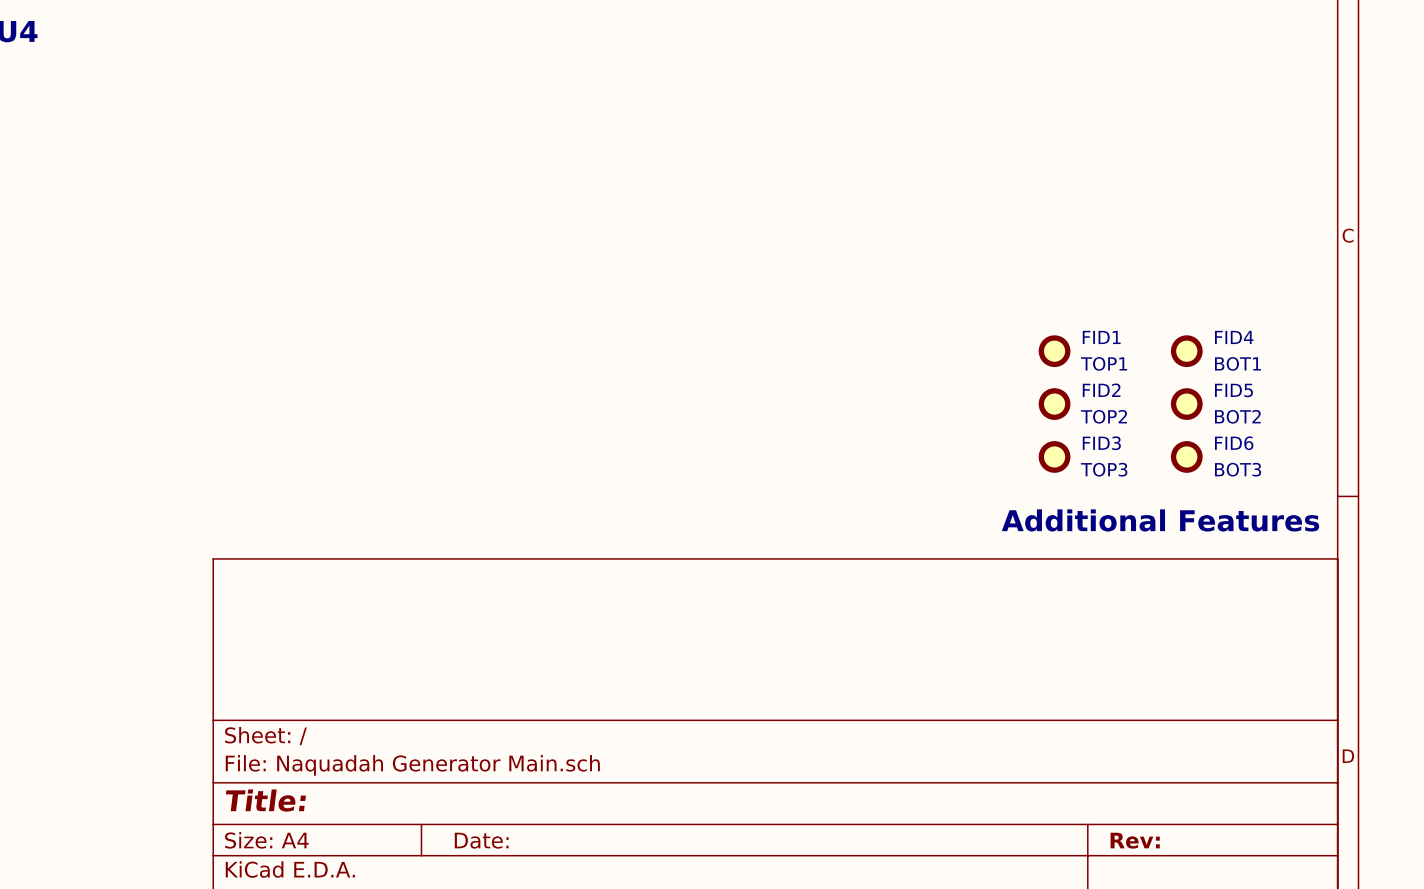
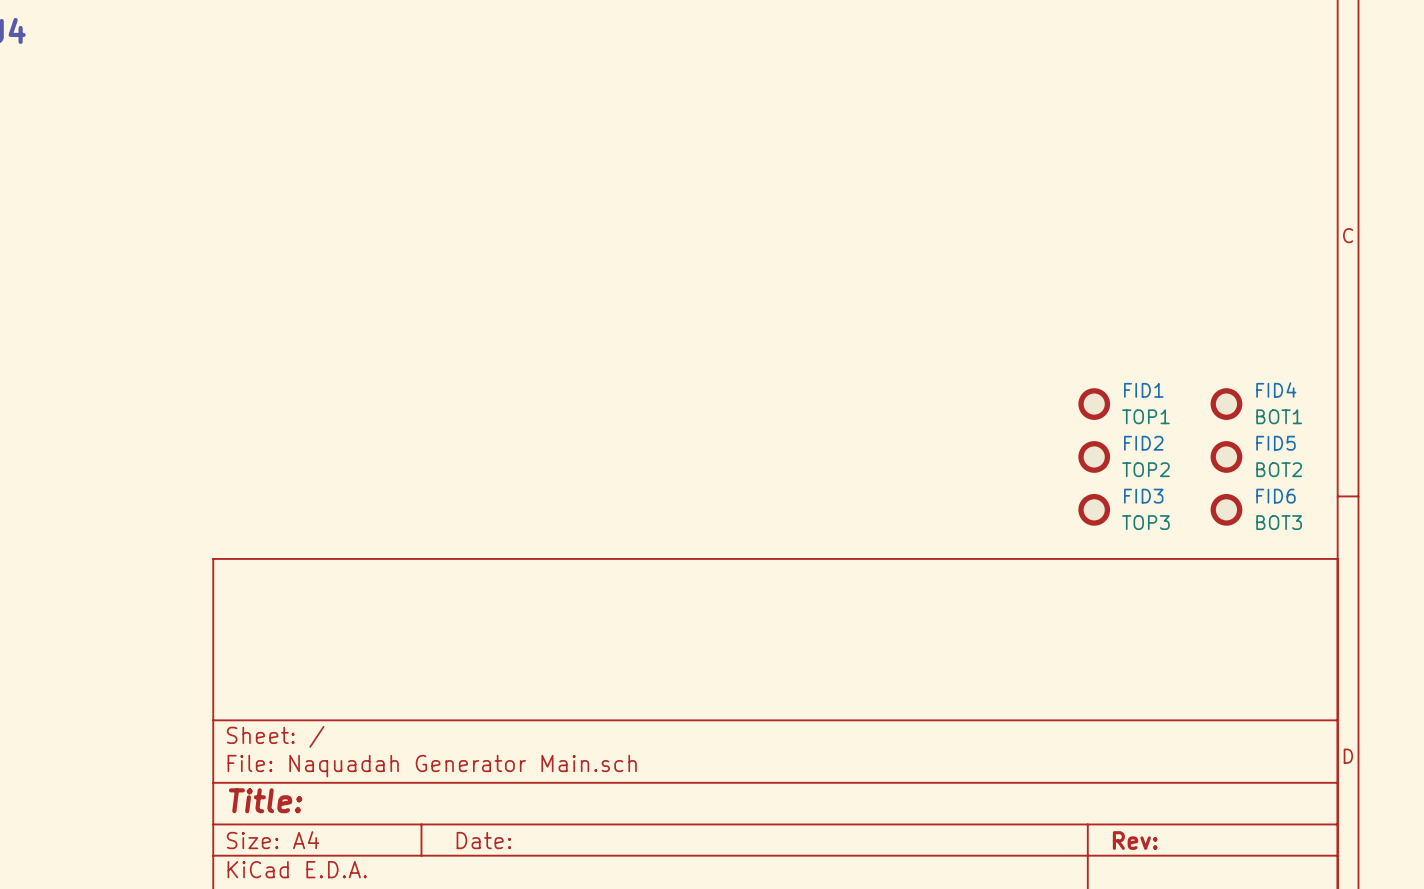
FID1 position: (1054, 351) -> (1094, 404)
FID4 position: (1186, 351) -> (1226, 404)
FID2 position: (1054, 404) -> (1094, 456)
FID5 position: (1186, 404) -> (1226, 456)
FID3 position: (1054, 456) -> (1094, 509)
FID6 position: (1186, 456) -> (1226, 509)
text: Additional Features (1160, 520) -> none

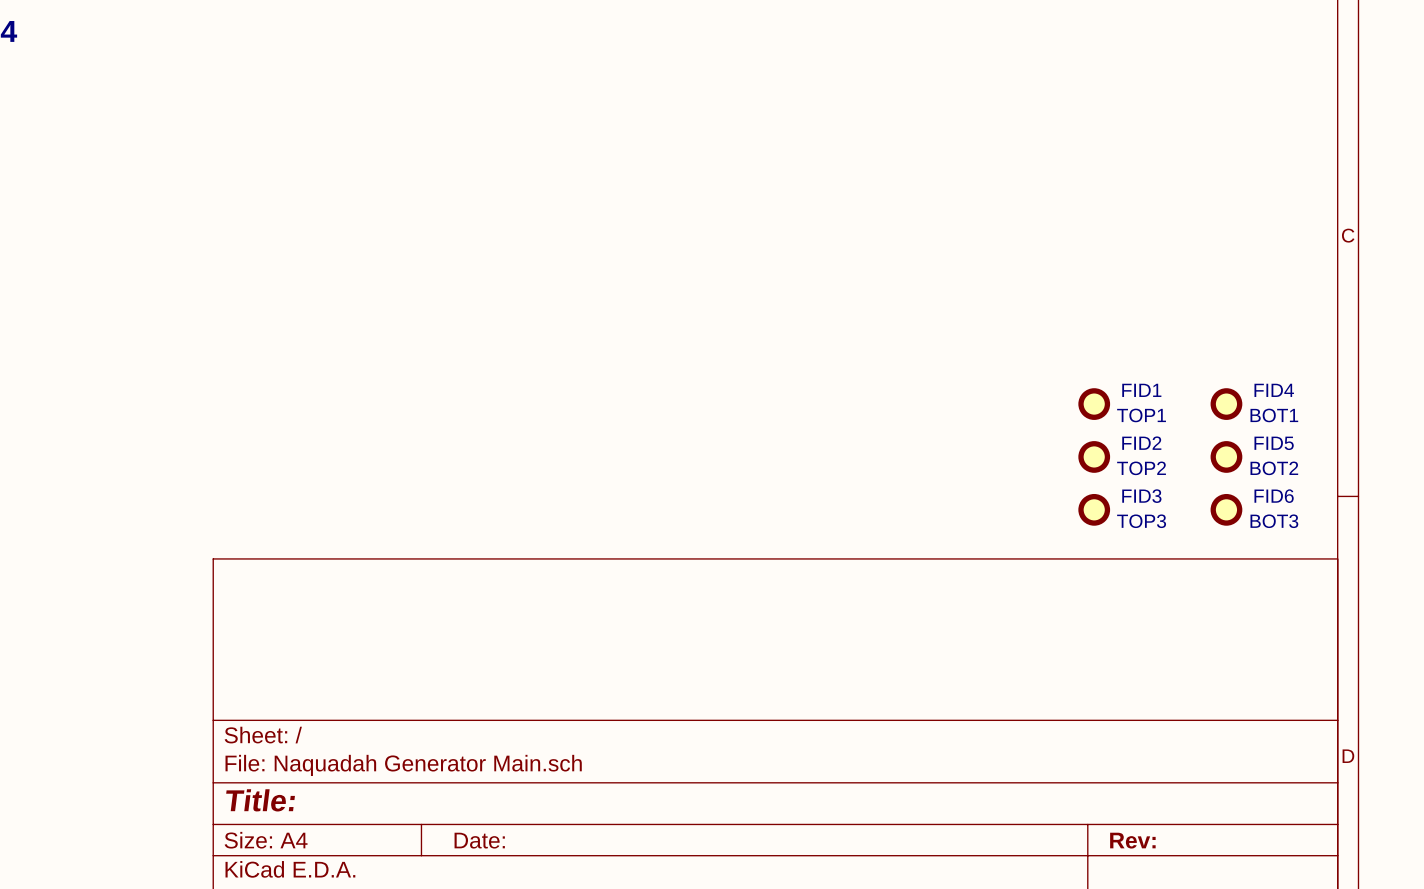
FID1 value: none -> TOP1 (1141, 415)
FID4 value: none -> BOT1 (1274, 415)
FID1 text: TOP1 (1145, 416) -> none
FID4 text: BOT1 (1279, 416) -> none
FID2 value: none -> TOP2 (1141, 468)
FID5 value: none -> BOT2 (1274, 468)
FID2 text: TOP2 (1145, 469) -> none
FID5 text: BOT2 (1279, 469) -> none
FID3 value: none -> TOP3 (1141, 521)
FID6 value: none -> BOT3 (1274, 521)
FID3 text: TOP3 (1145, 522) -> none
FID6 text: BOT3 (1279, 522) -> none

